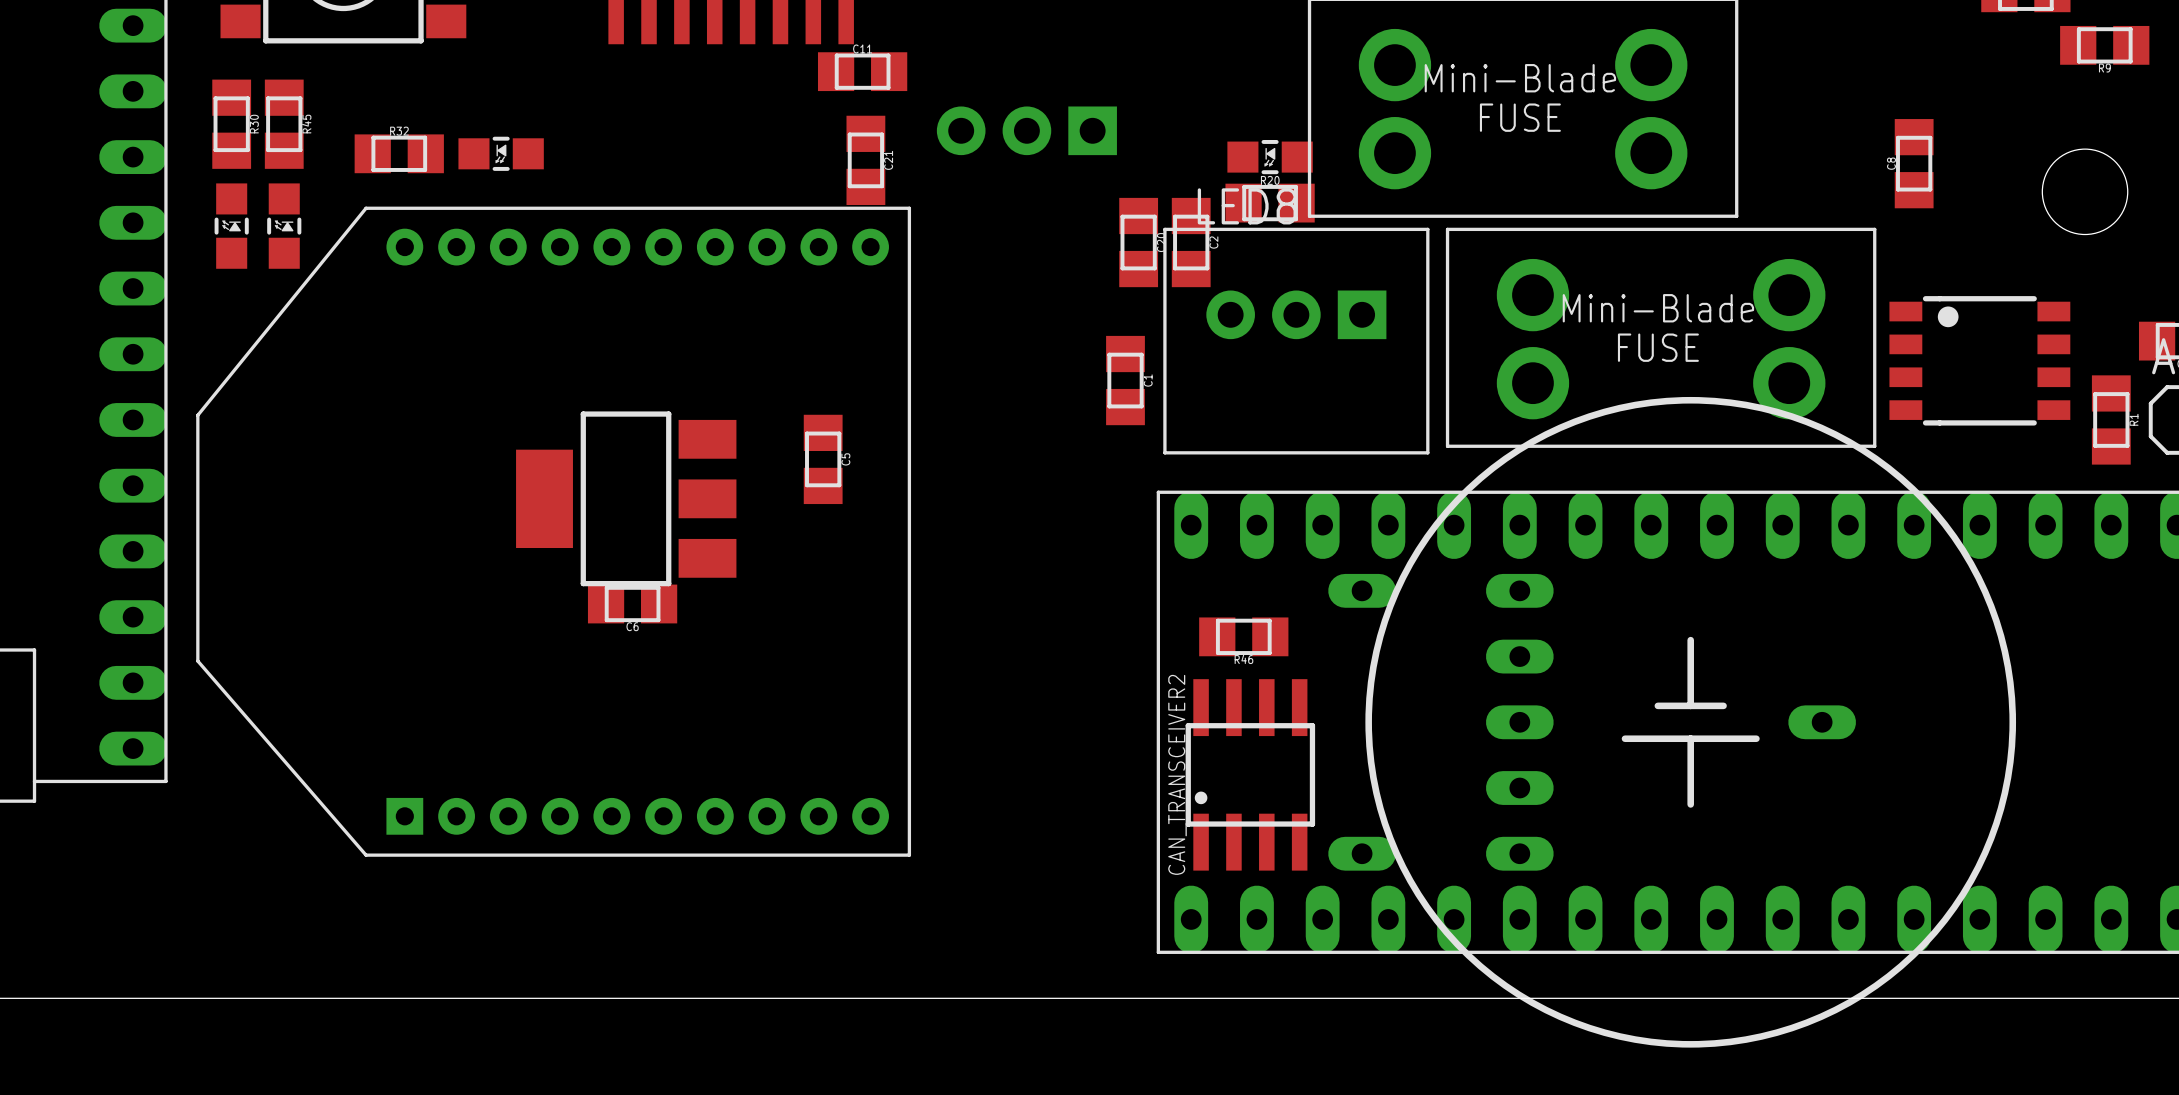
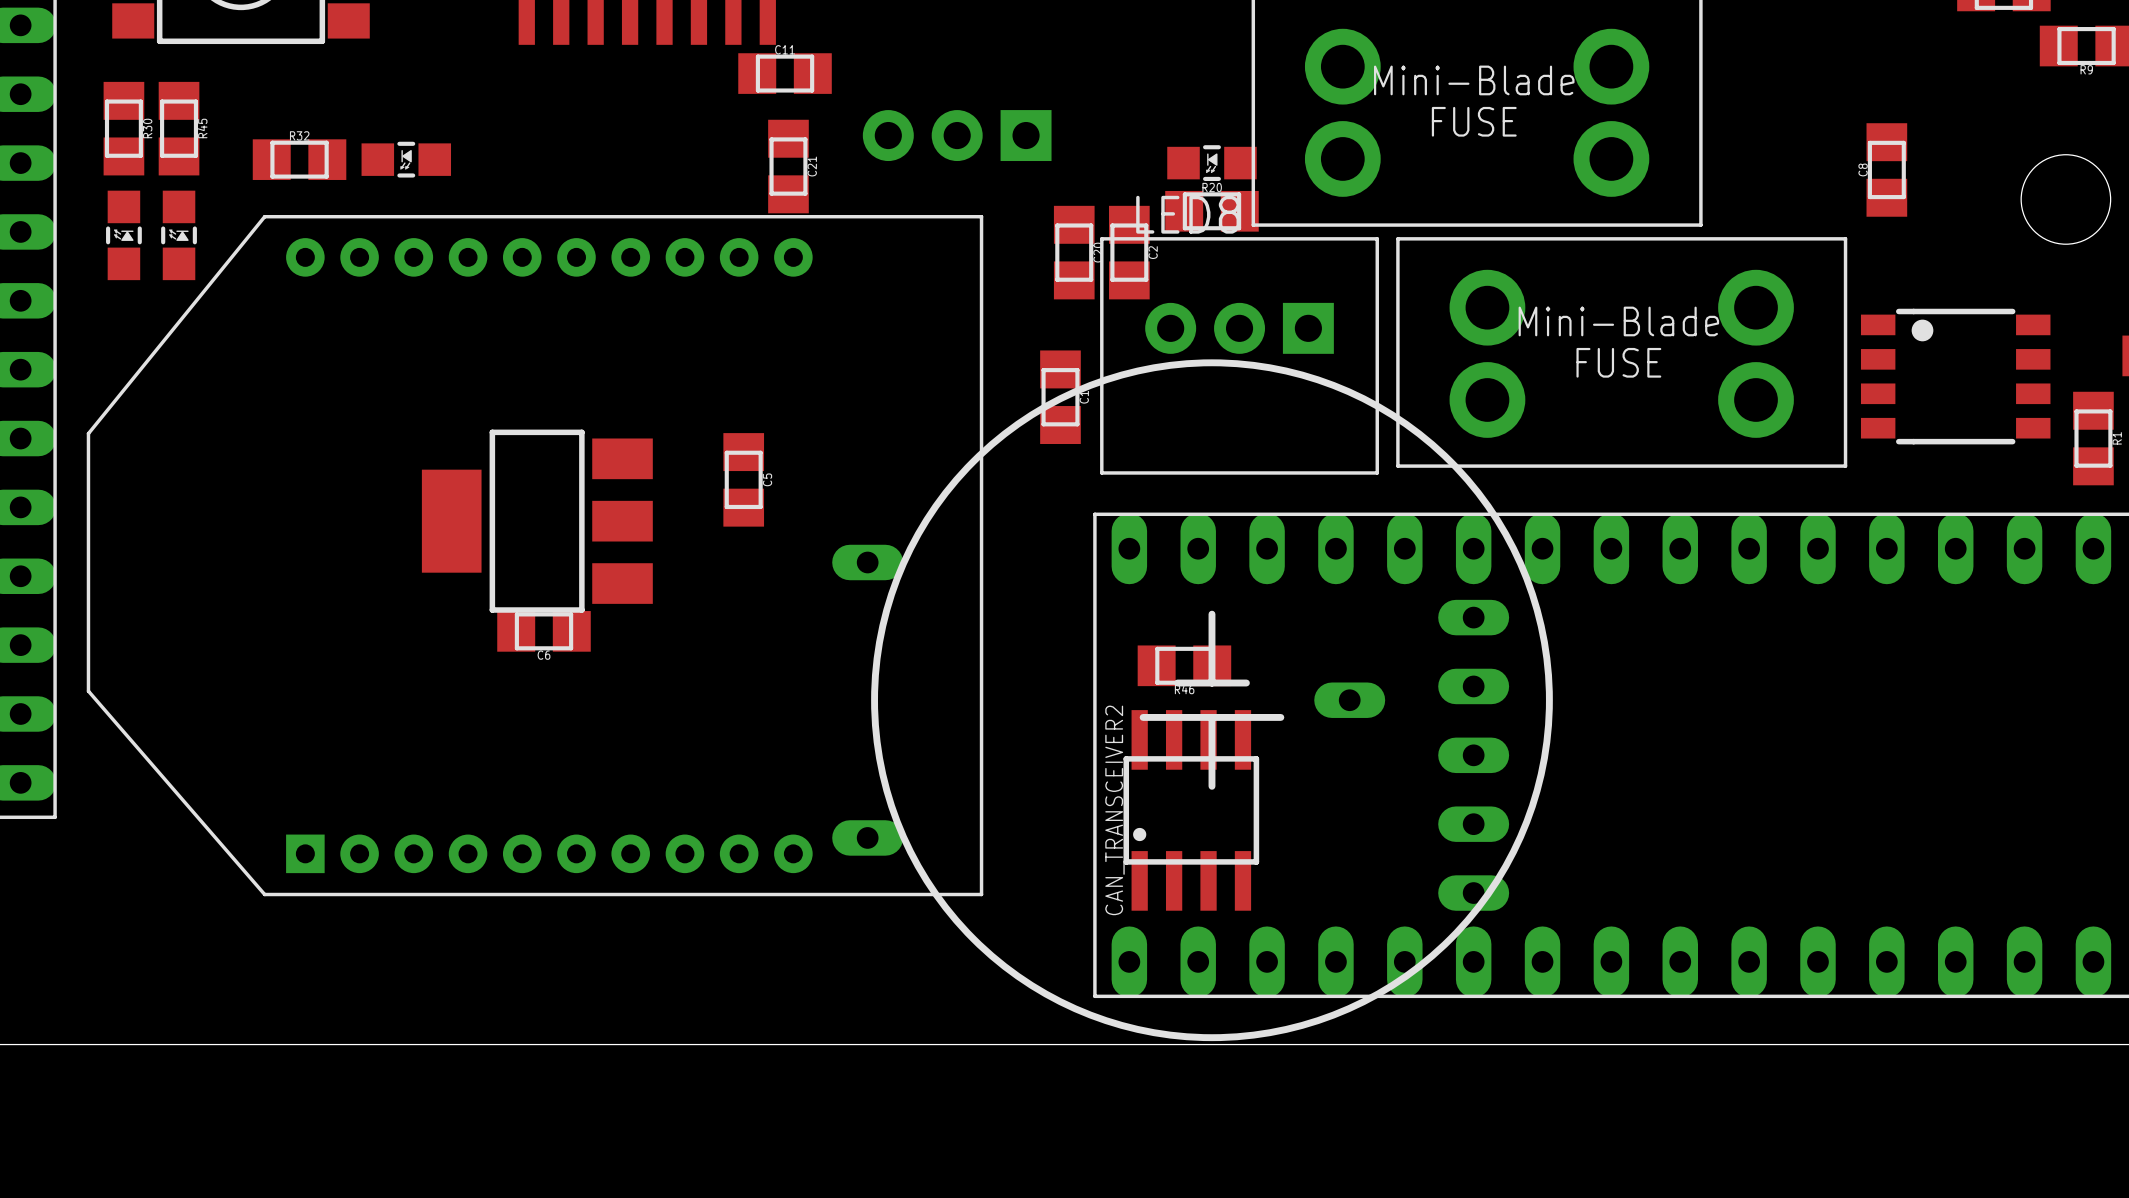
part: (553, 531) -> none
part: none -> (535, 555)
part position: (1672, 722) -> (1192, 700)

